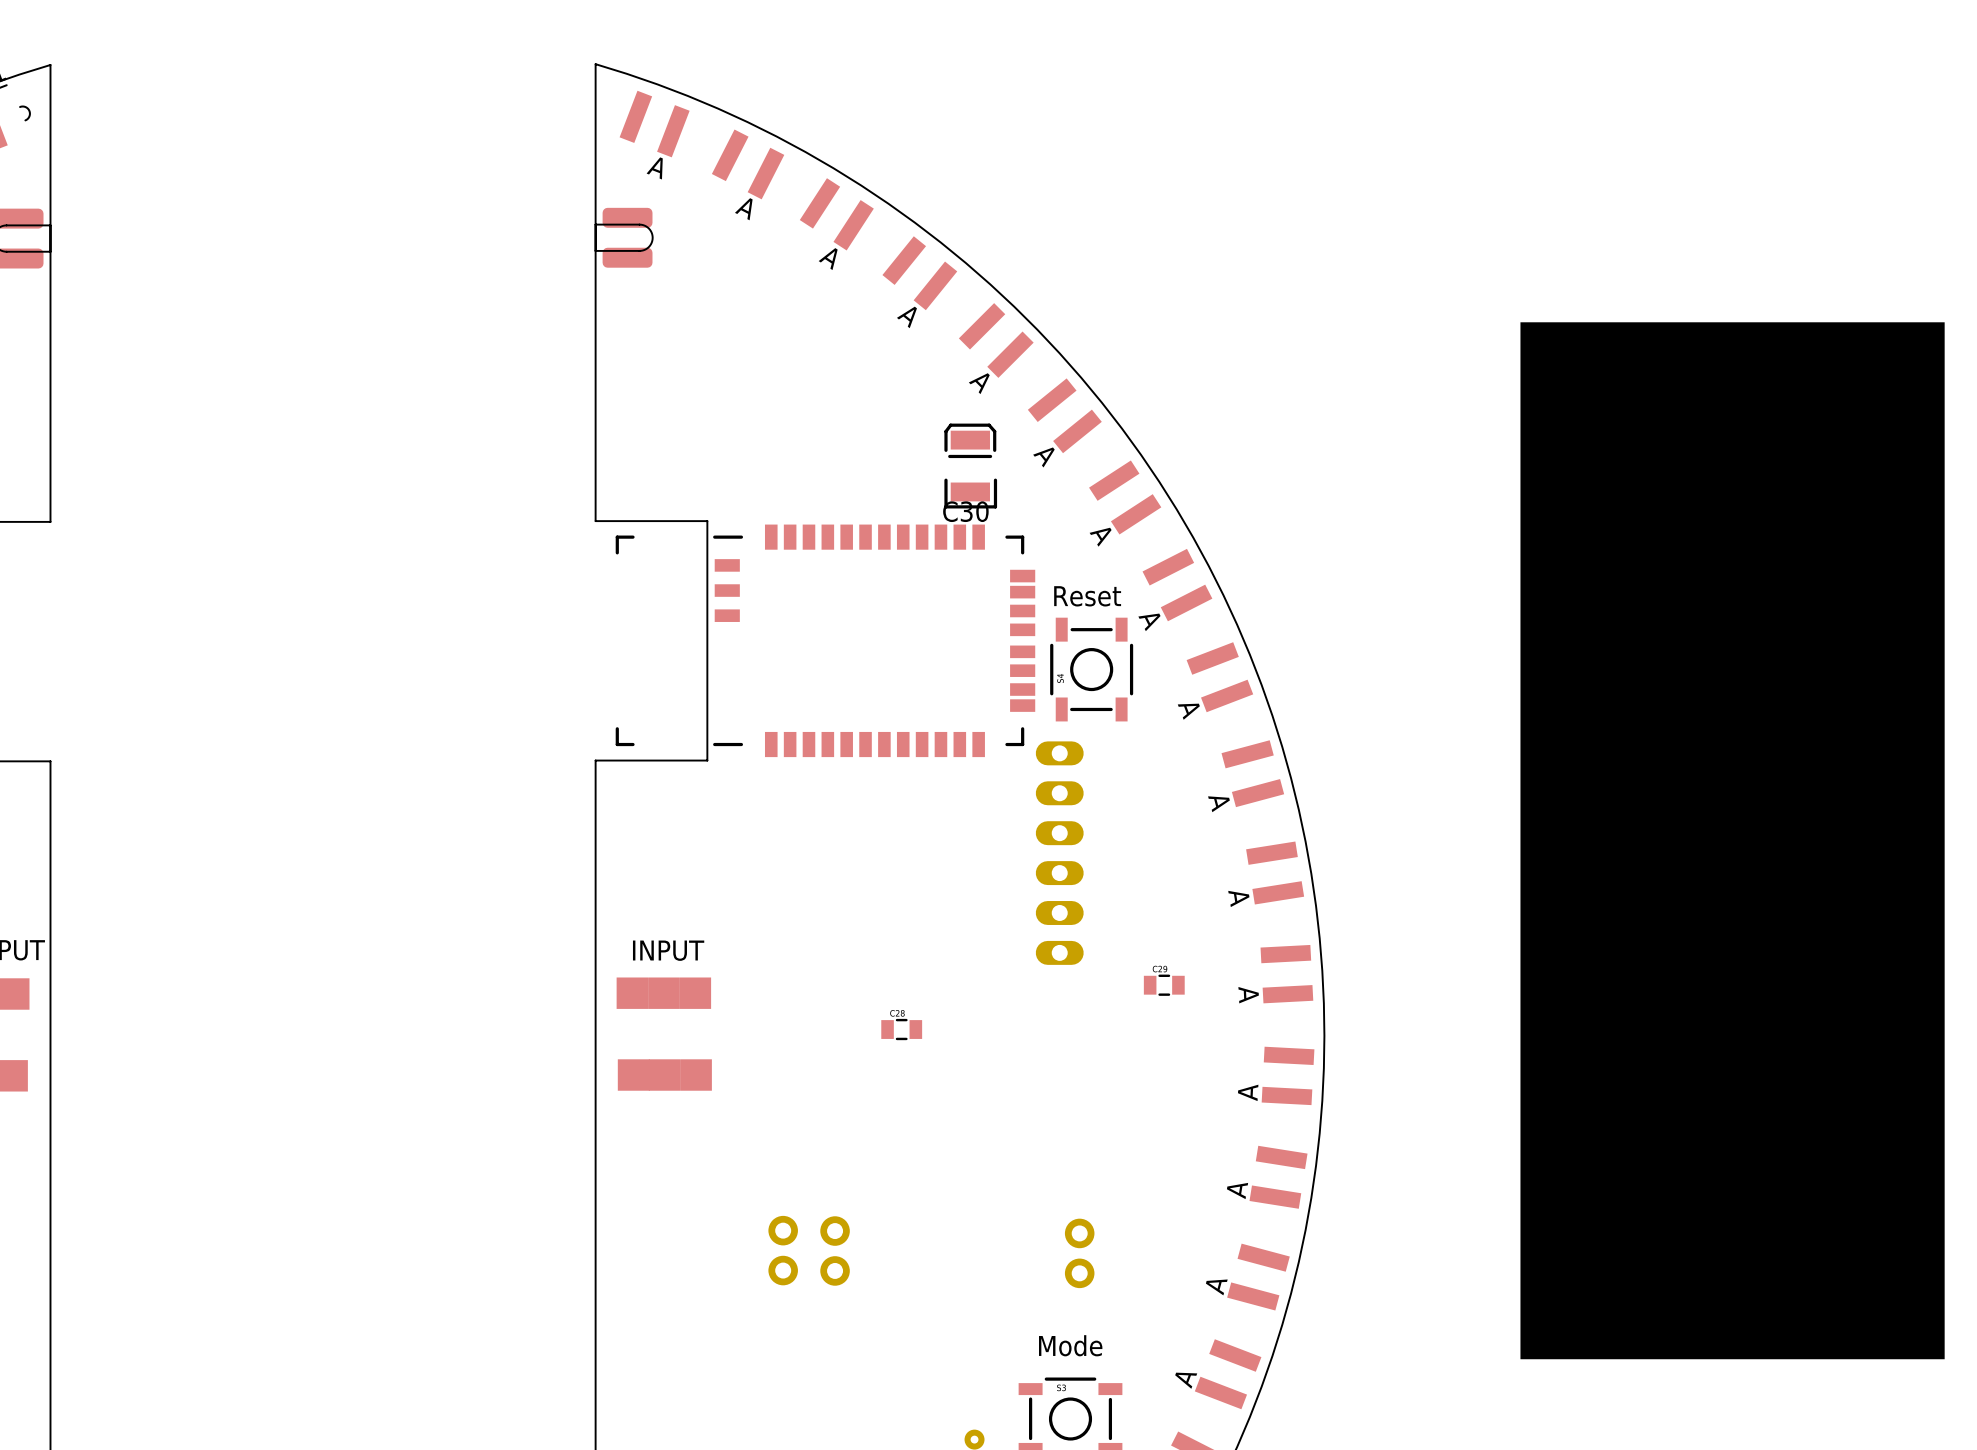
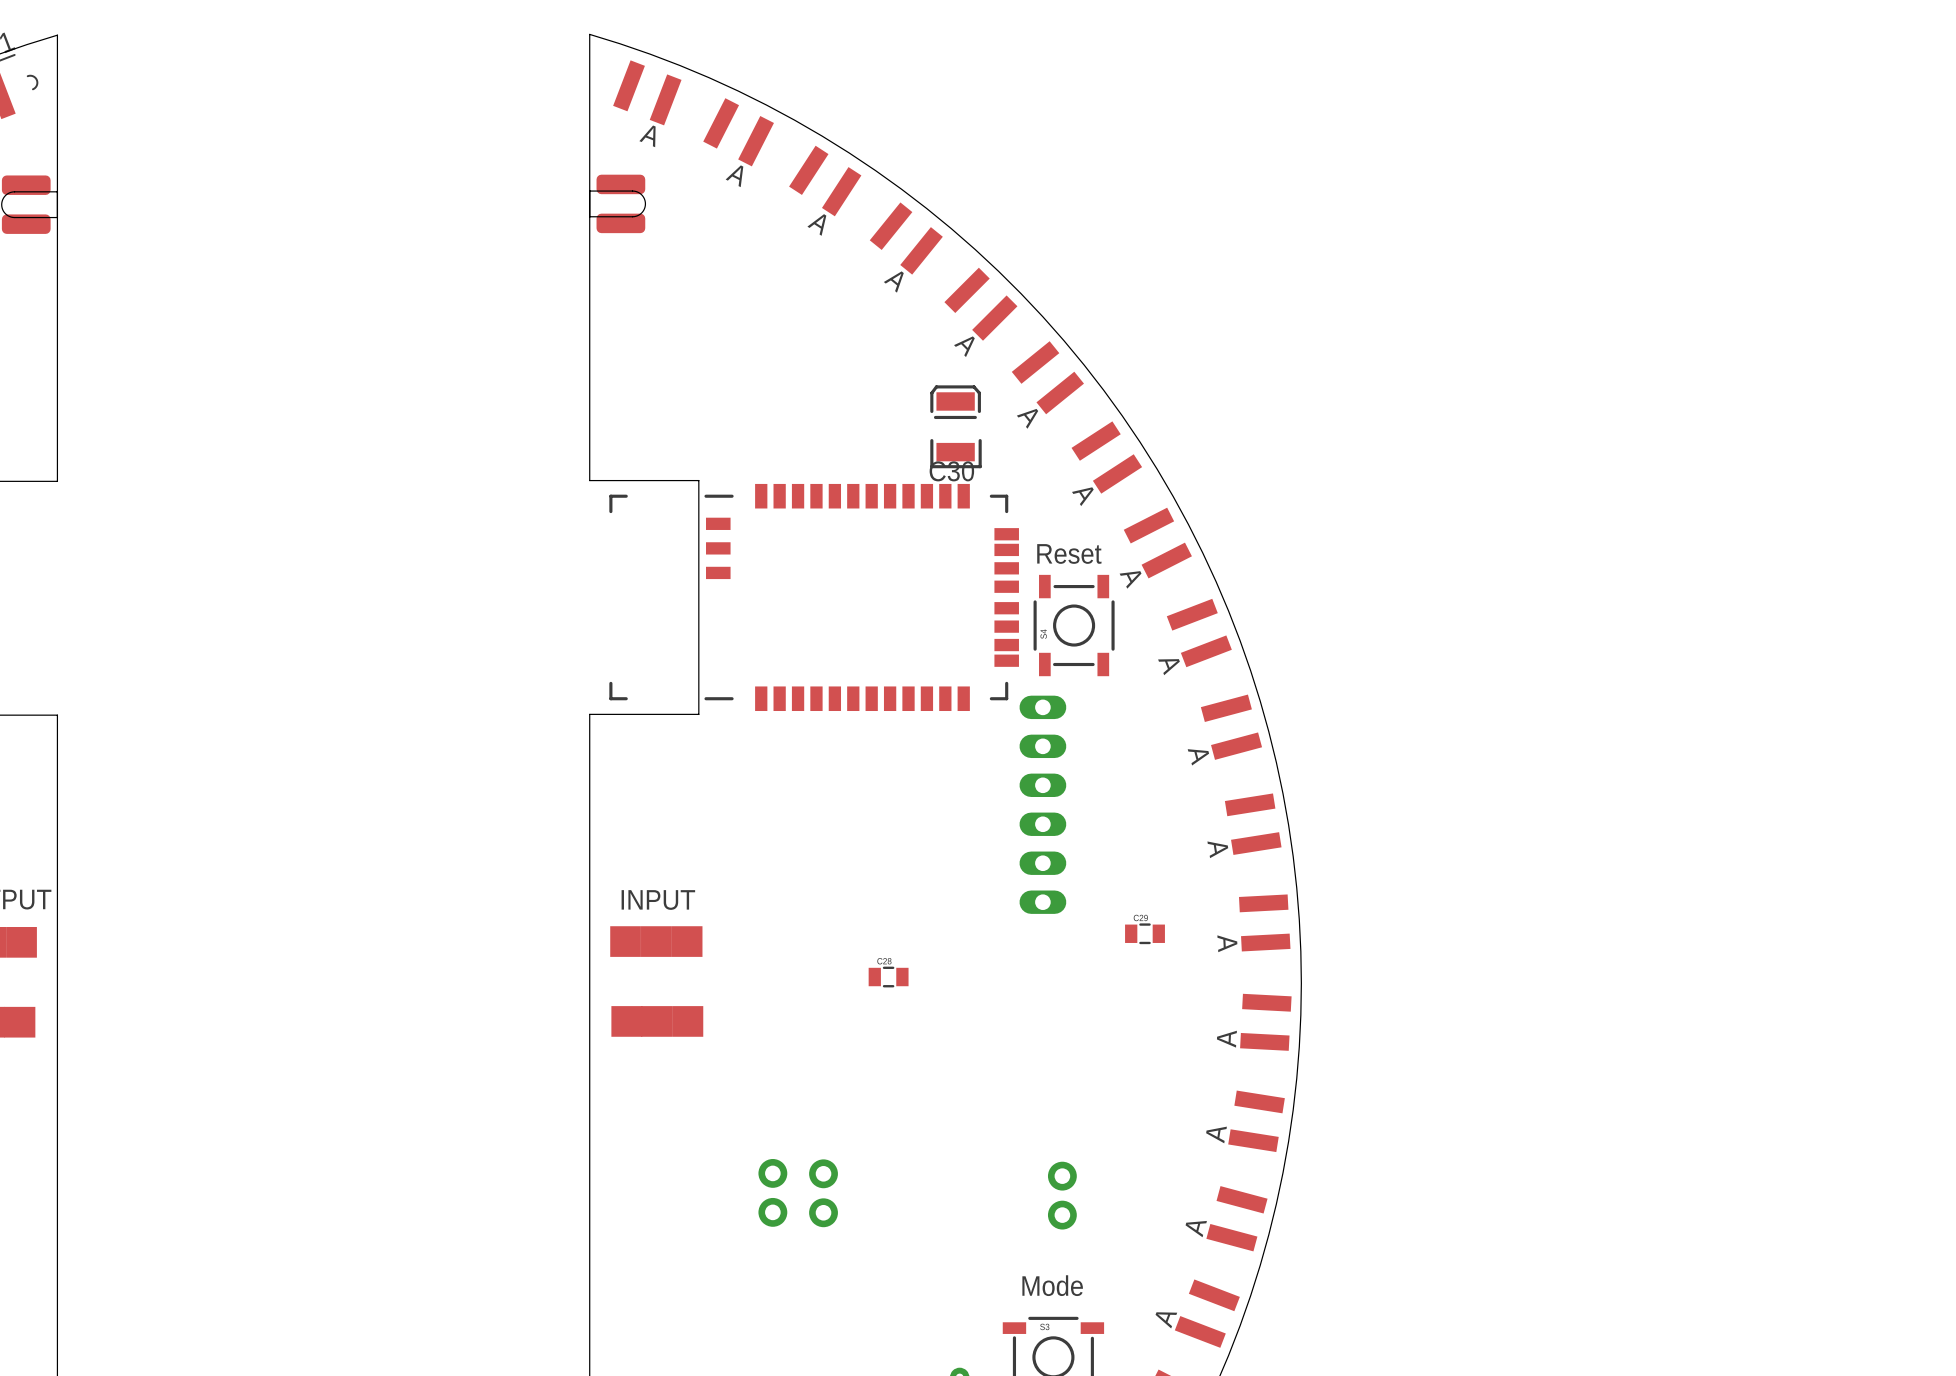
drawing: [1520, 322, 1945, 1360] -> none

